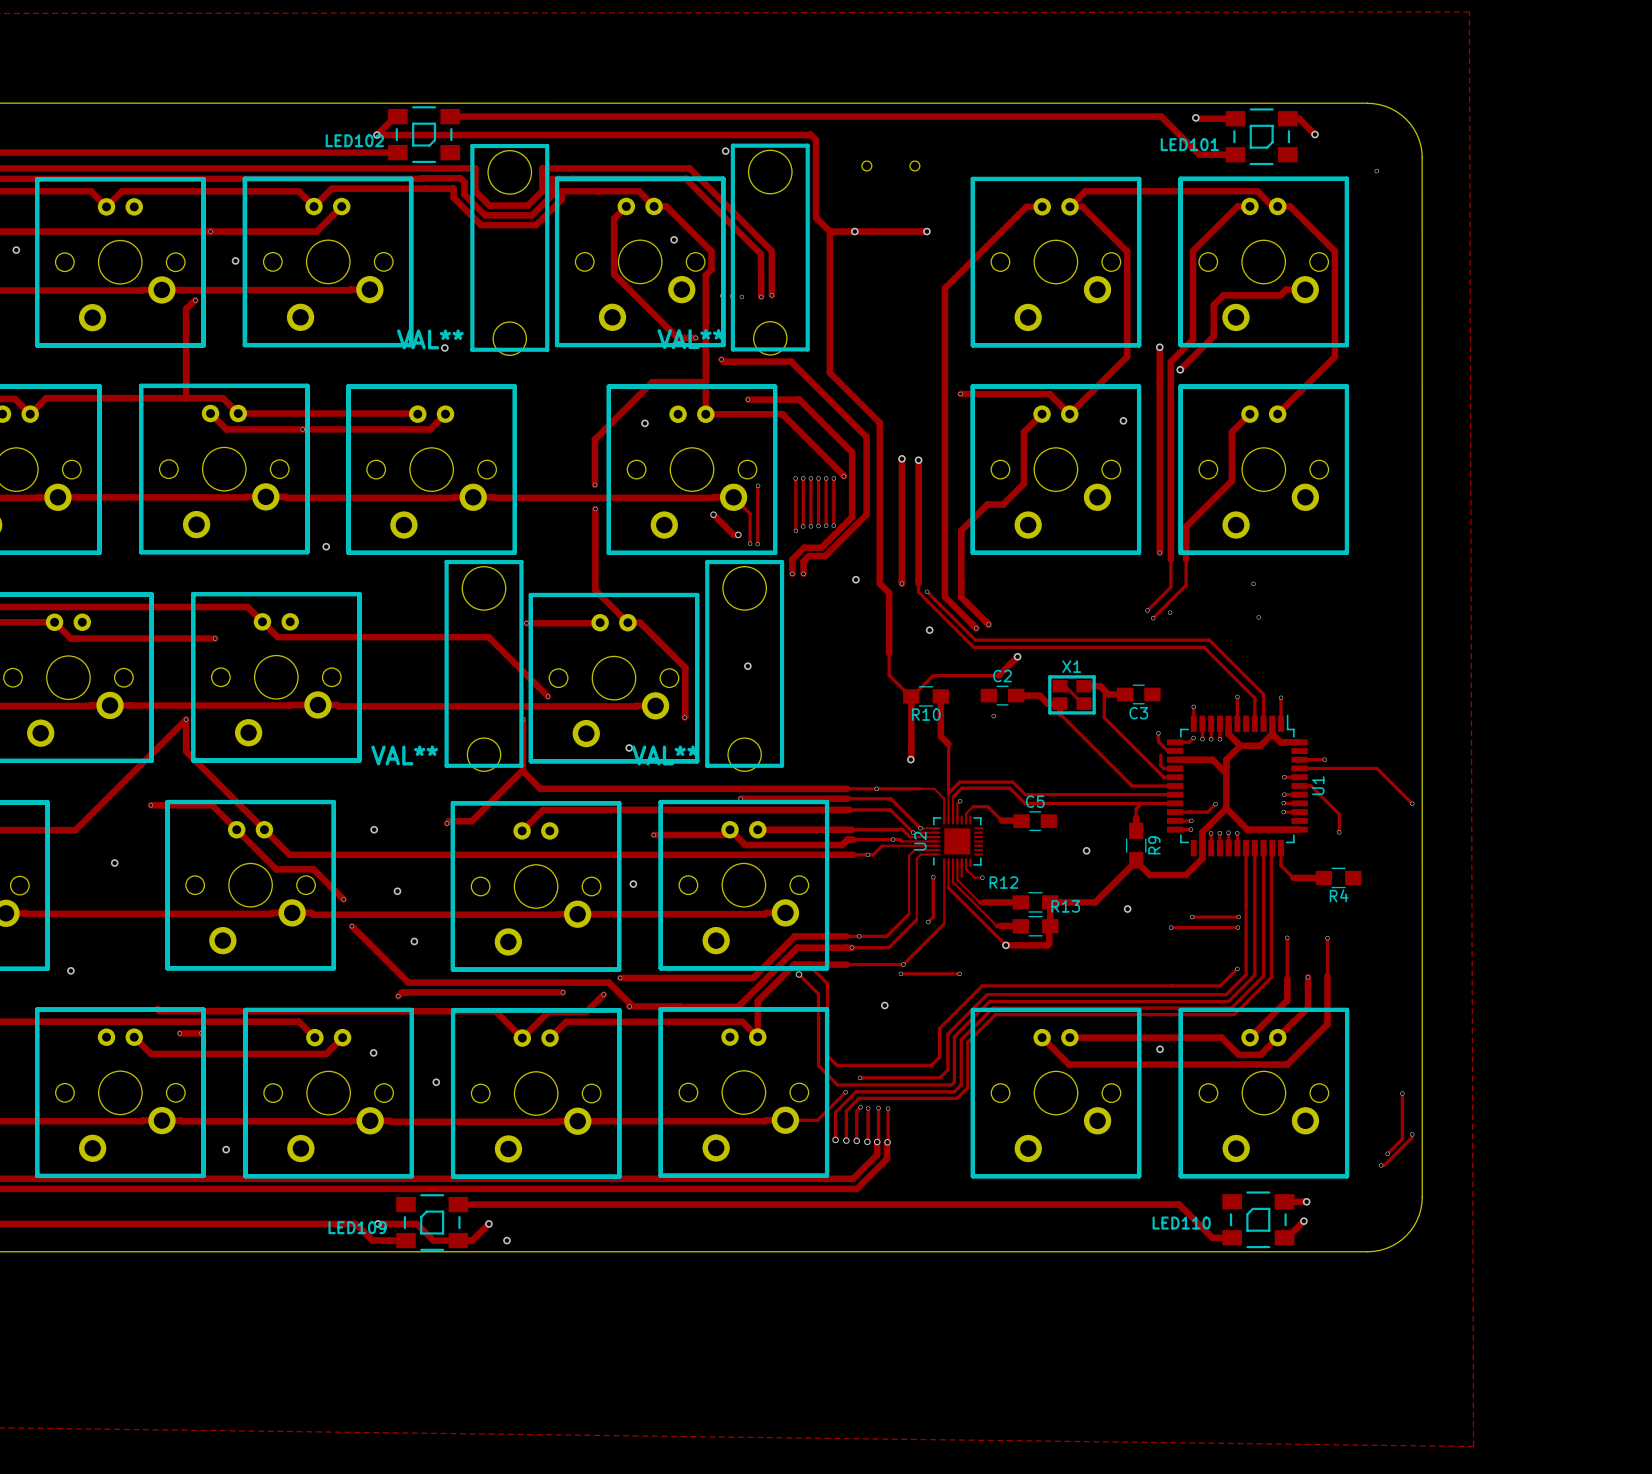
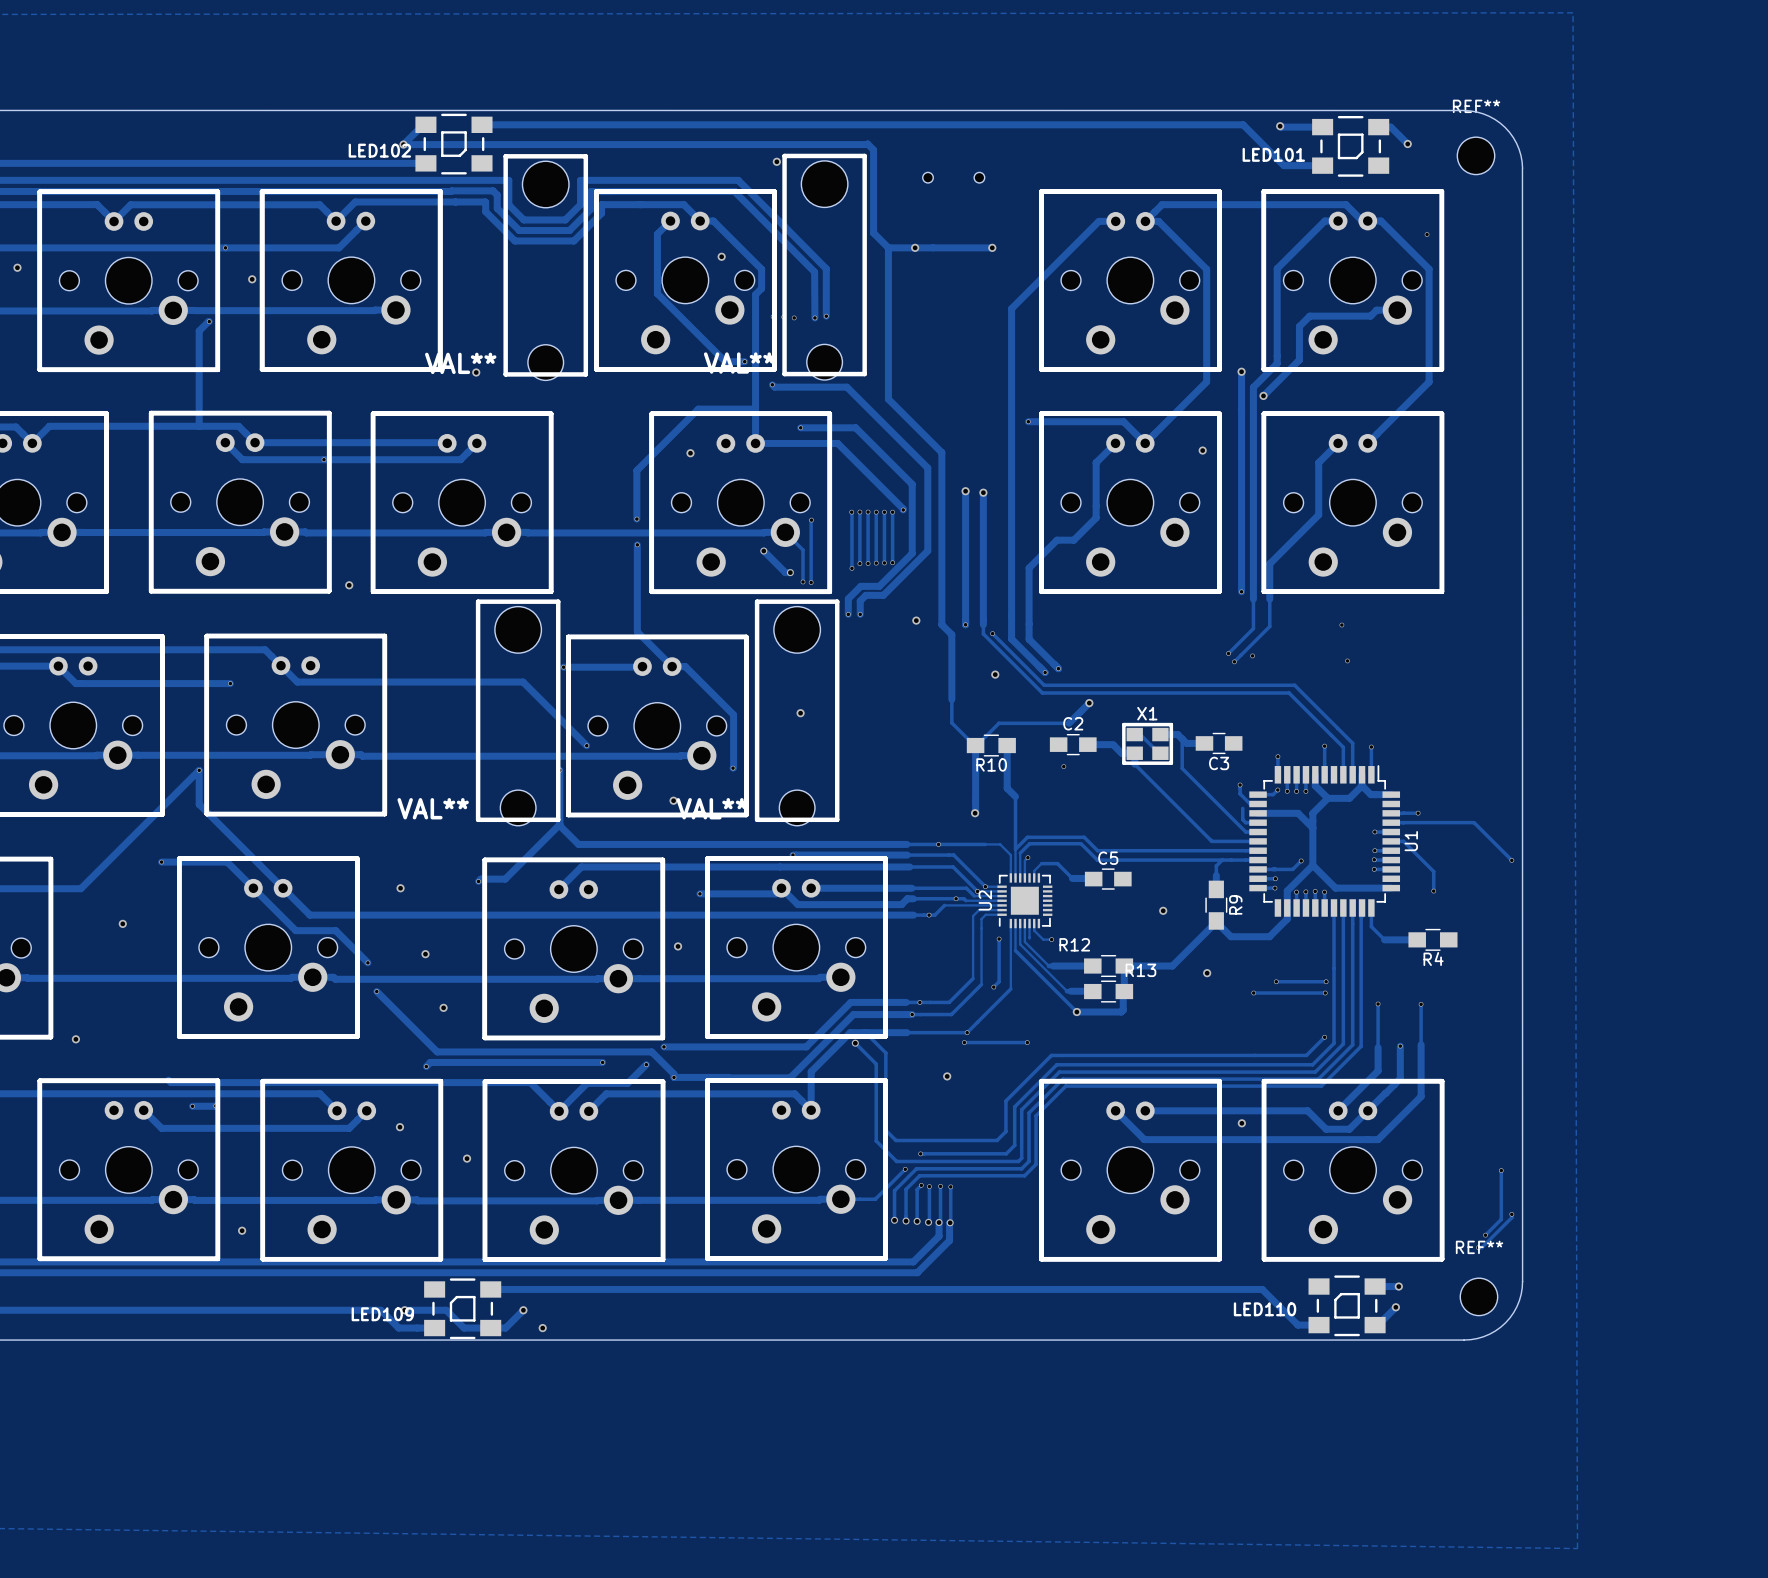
REF**: none -> (1476, 155)
via position: (1376, 171) -> (1427, 234)
REF**: none -> (1478, 1296)

